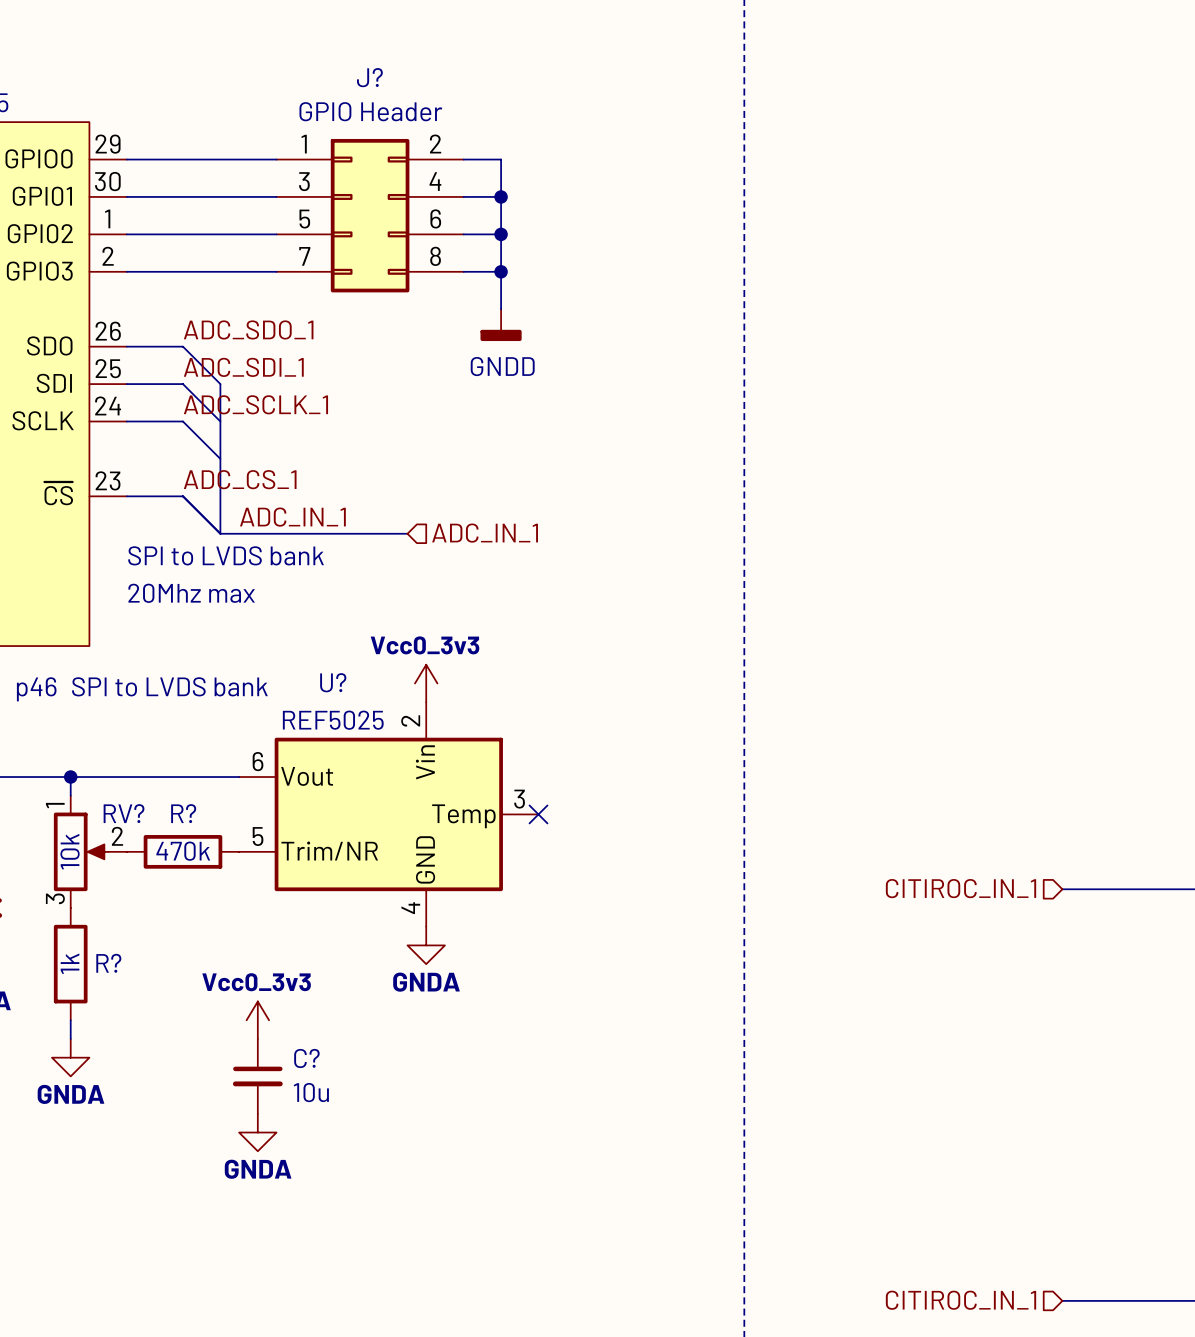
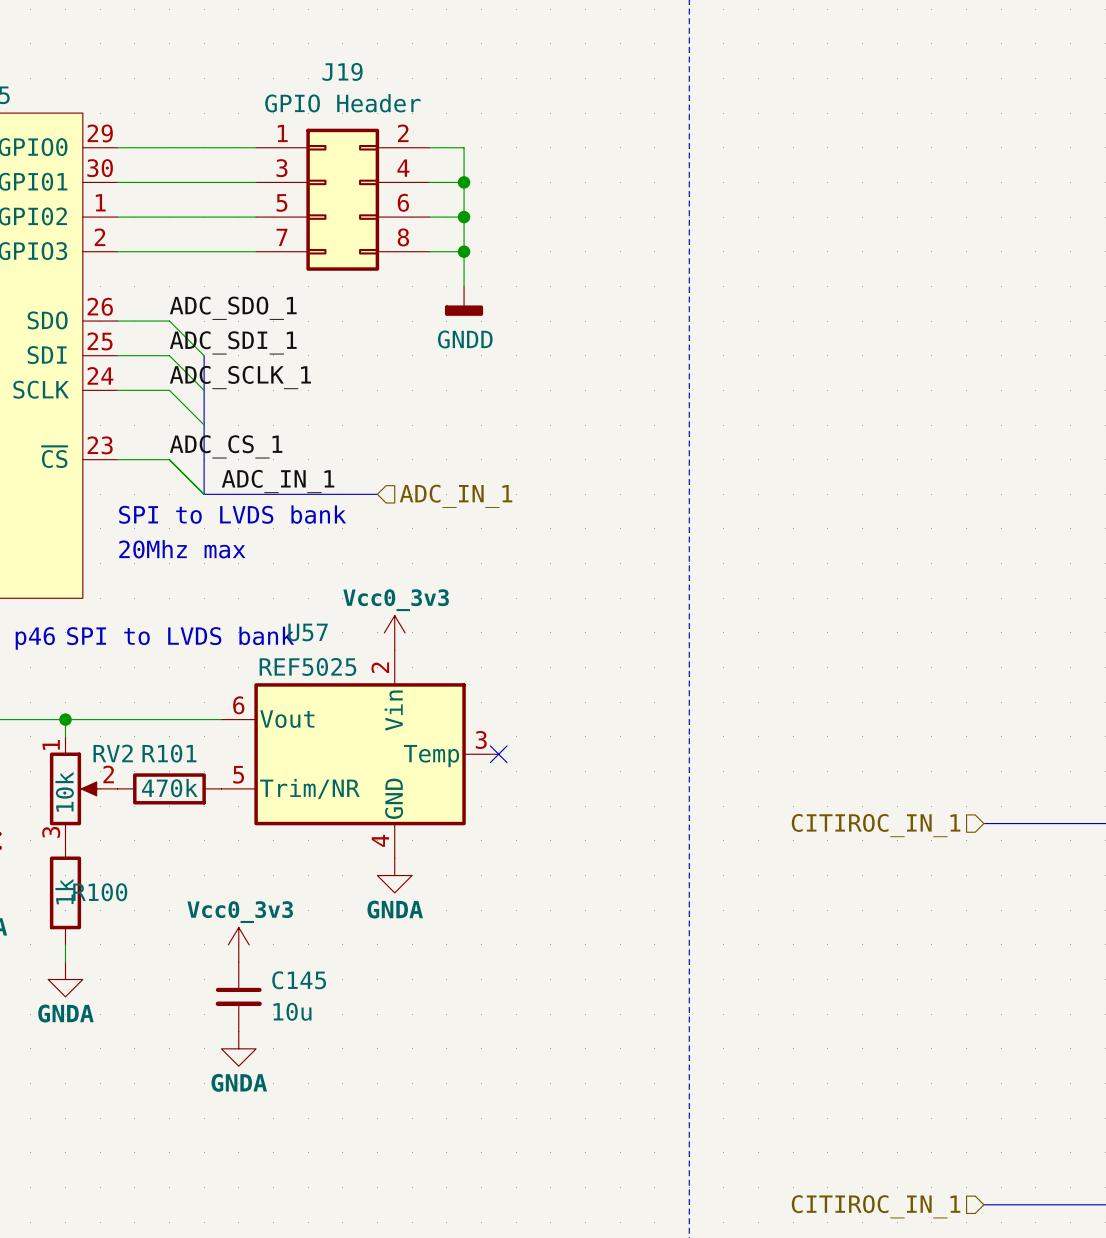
J? name: J? (369, 77) -> J19 (342, 71)
U? name: U? (333, 682) -> U57 (308, 632)
RV? name: RV? (124, 813) -> RV2 (113, 753)
R? name: R? (183, 813) -> R101 (169, 753)
R? name: R? (108, 963) -> R100 (100, 892)
C? name: C? (306, 1058) -> C145 (299, 980)

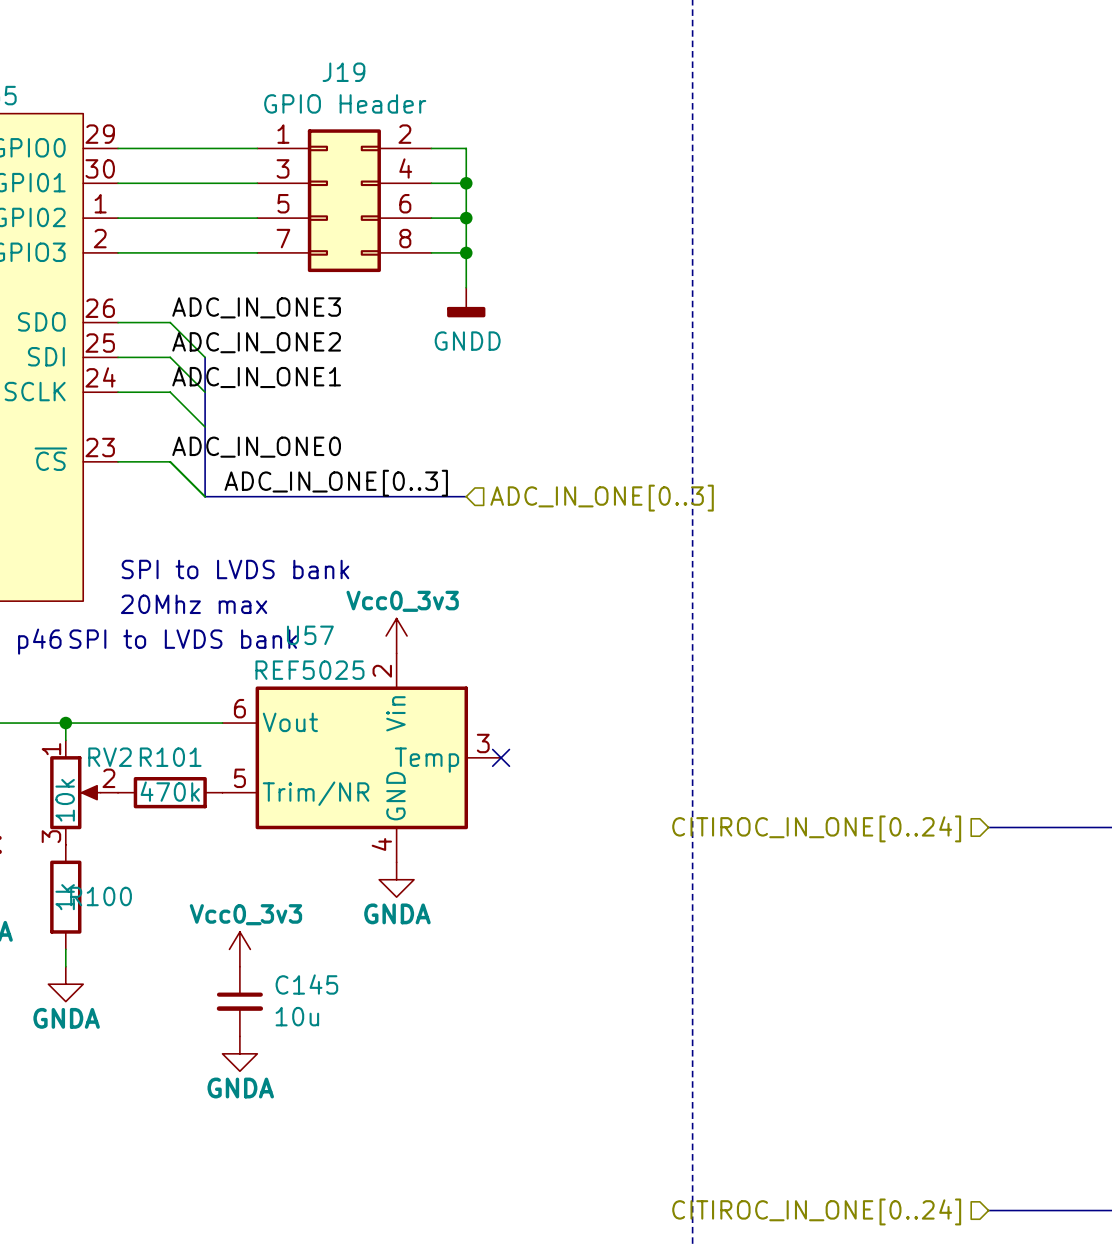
label: ADC_SDO_1 (233, 308) -> ADC_IN_ONE3 (256, 307)
label: ADC_SDI_1 (233, 342) -> ADC_IN_ONE2 (256, 342)
label: ADC_SCLK_1 (240, 377) -> ADC_IN_ONE1 (256, 377)
label: ADC_CS_1 (226, 446) -> ADC_IN_ONE0 (256, 447)
label: ADC_IN_1 (278, 481) -> ADC_IN_ONE[0..3] (336, 483)
bus: none -> (379, 496) (466, 496)
hierarchical label: ADC_IN_1 (456, 496) -> none
hierarchical label: none -> ADC_IN_ONE[0..3] (602, 498)
text position: SPI to LVDS bank (232, 514) -> SPI to LVDS bank (235, 569)
text position: 20Mhz max (182, 549) -> 20Mhz max (194, 604)
hierarchical label: CITIROC_IN_1 (876, 825) -> CITIROC_IN_ONE[0..24] (816, 828)
hierarchical label: CITIROC_IN_1 (876, 1206) -> CITIROC_IN_ONE[0..24] (816, 1211)

